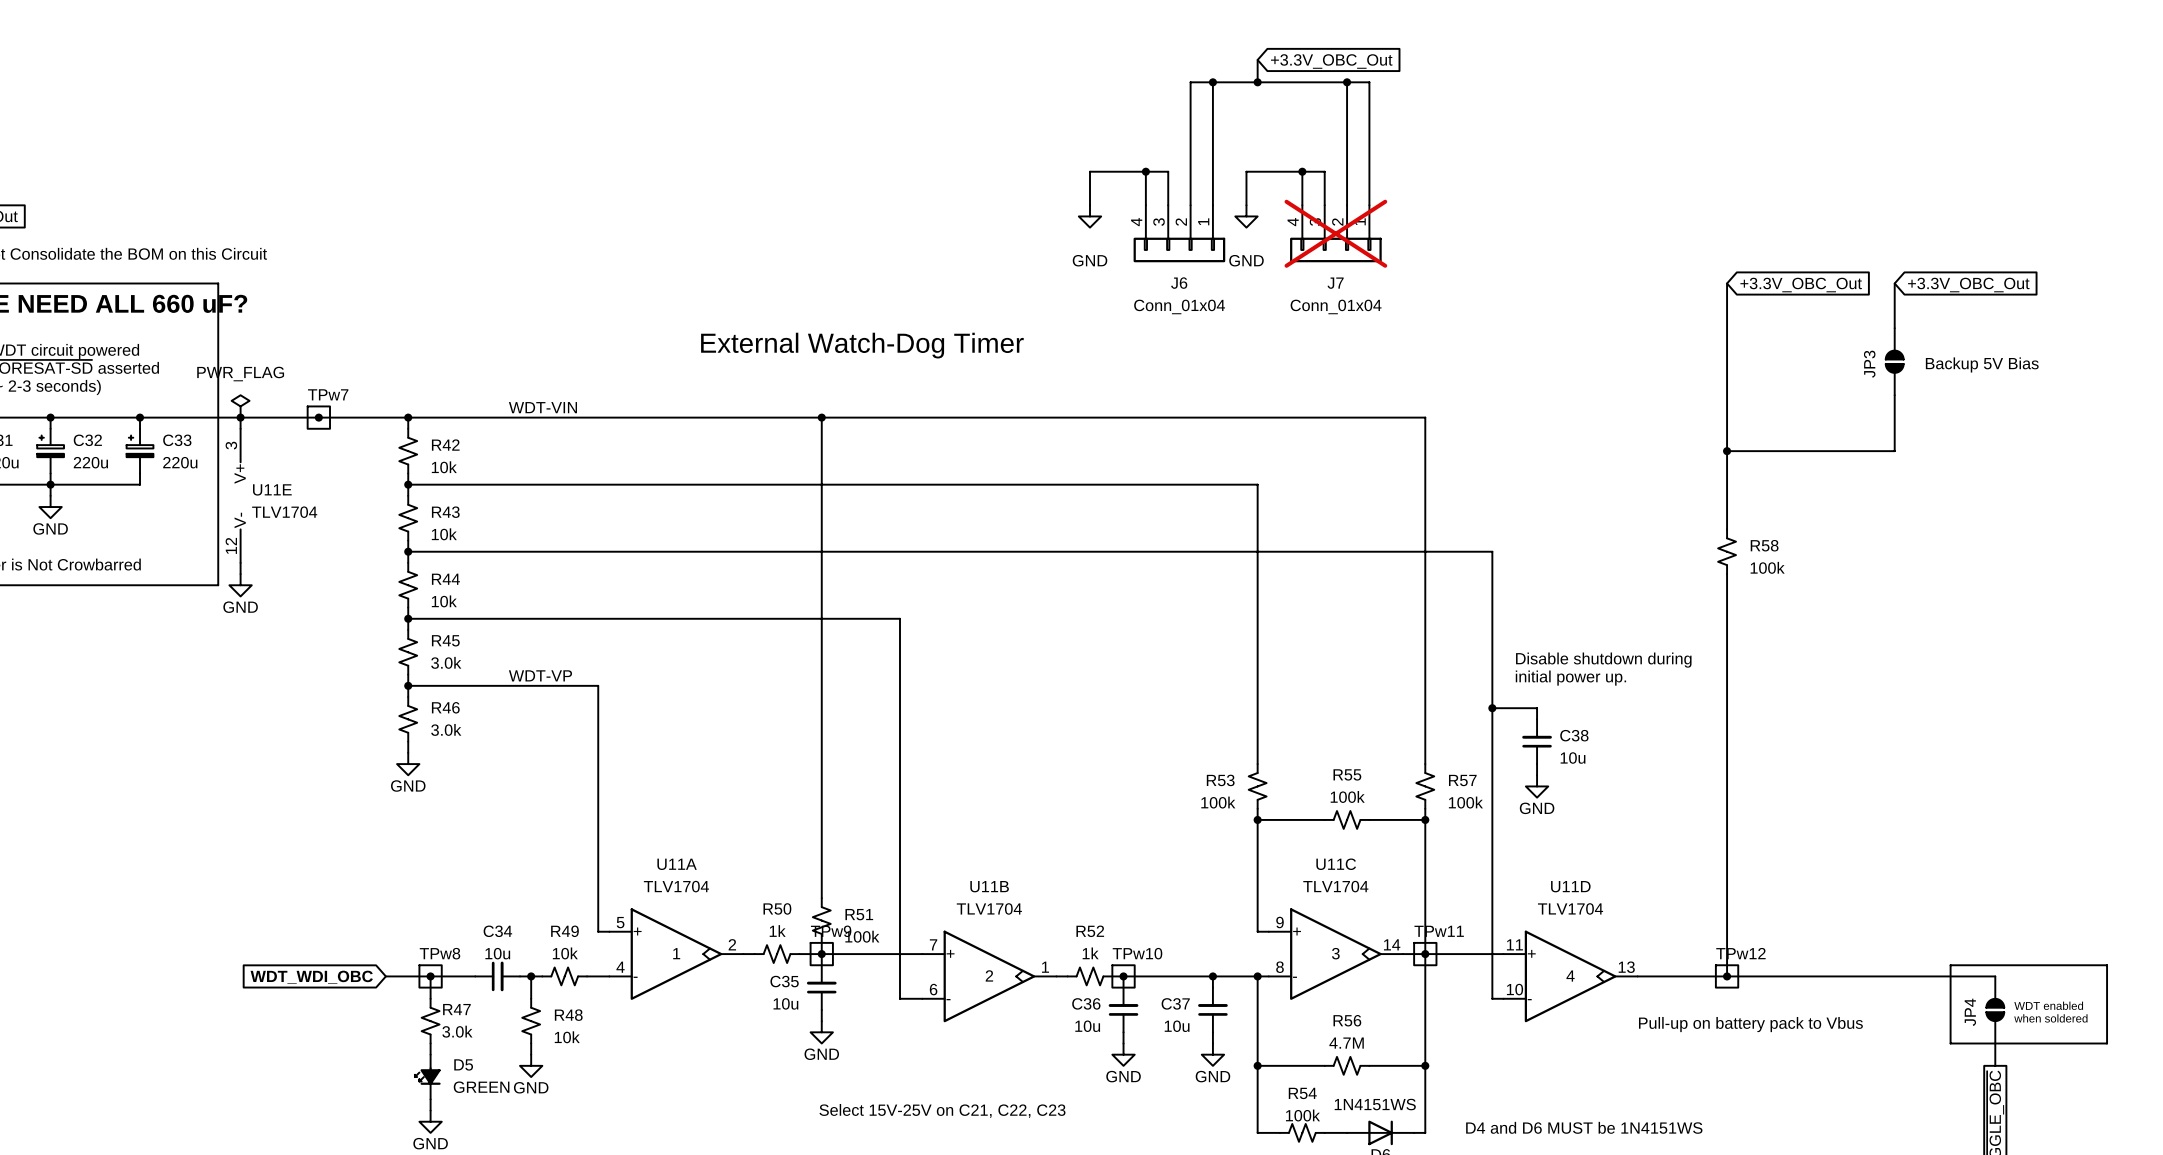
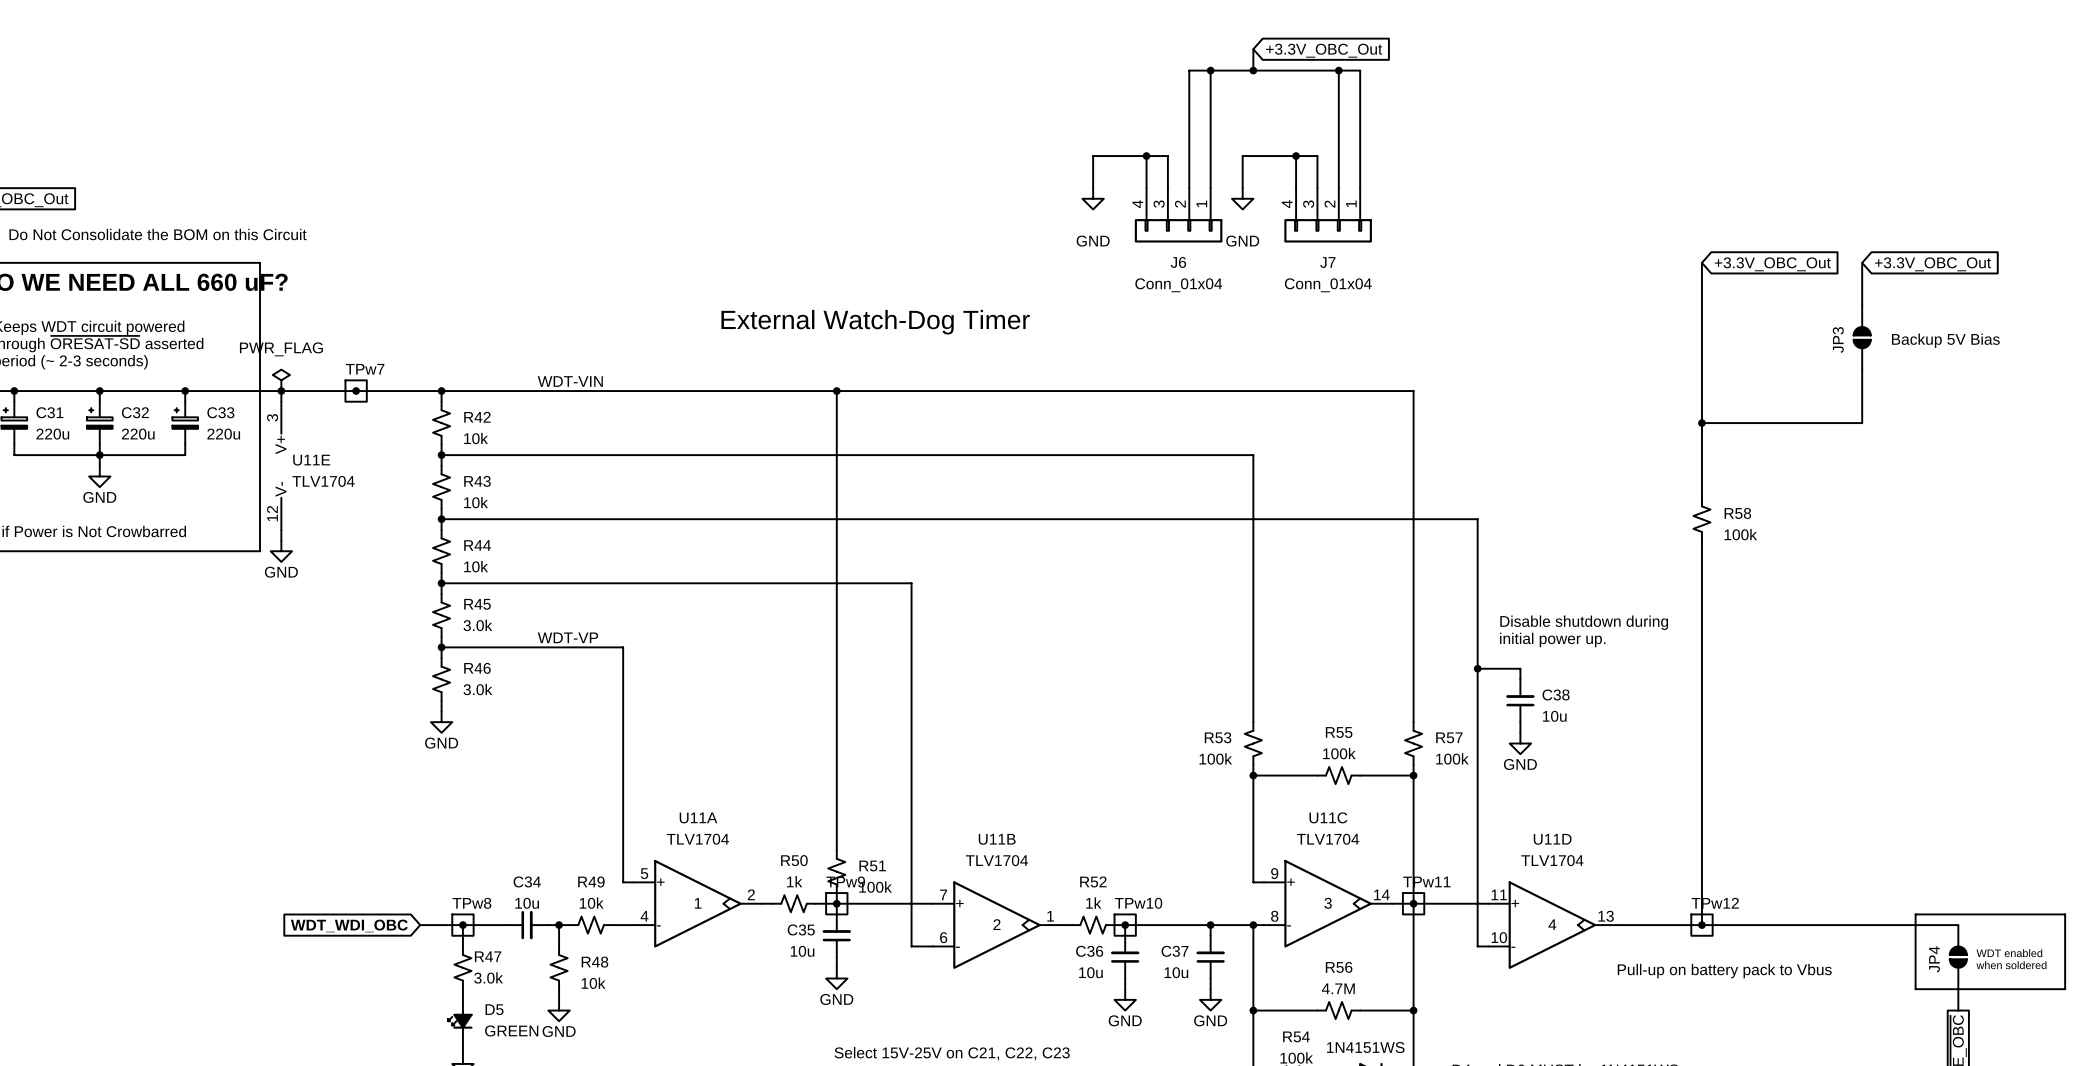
J7 do-not-place cross: (1335, 233) -> none

